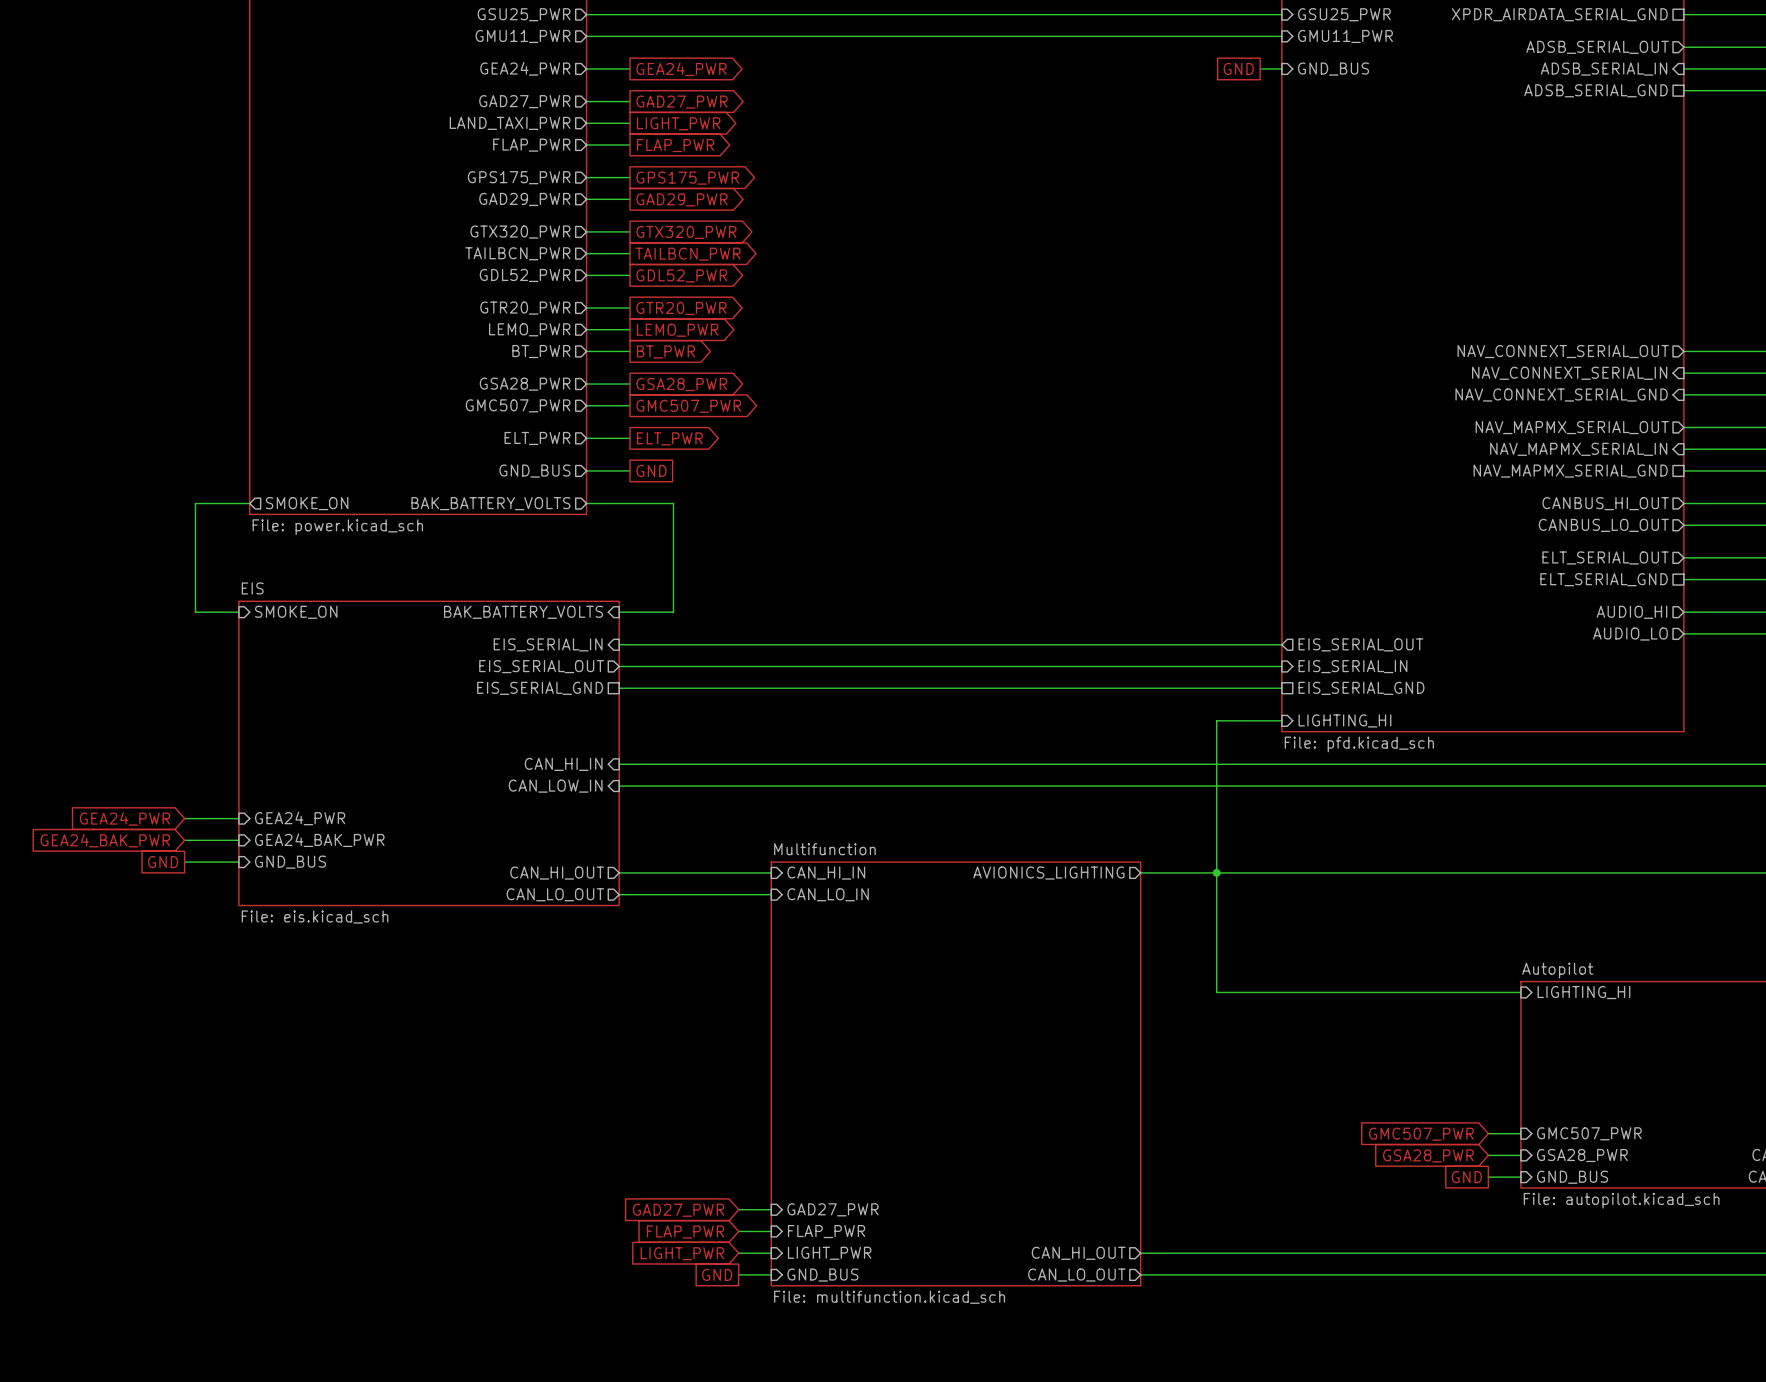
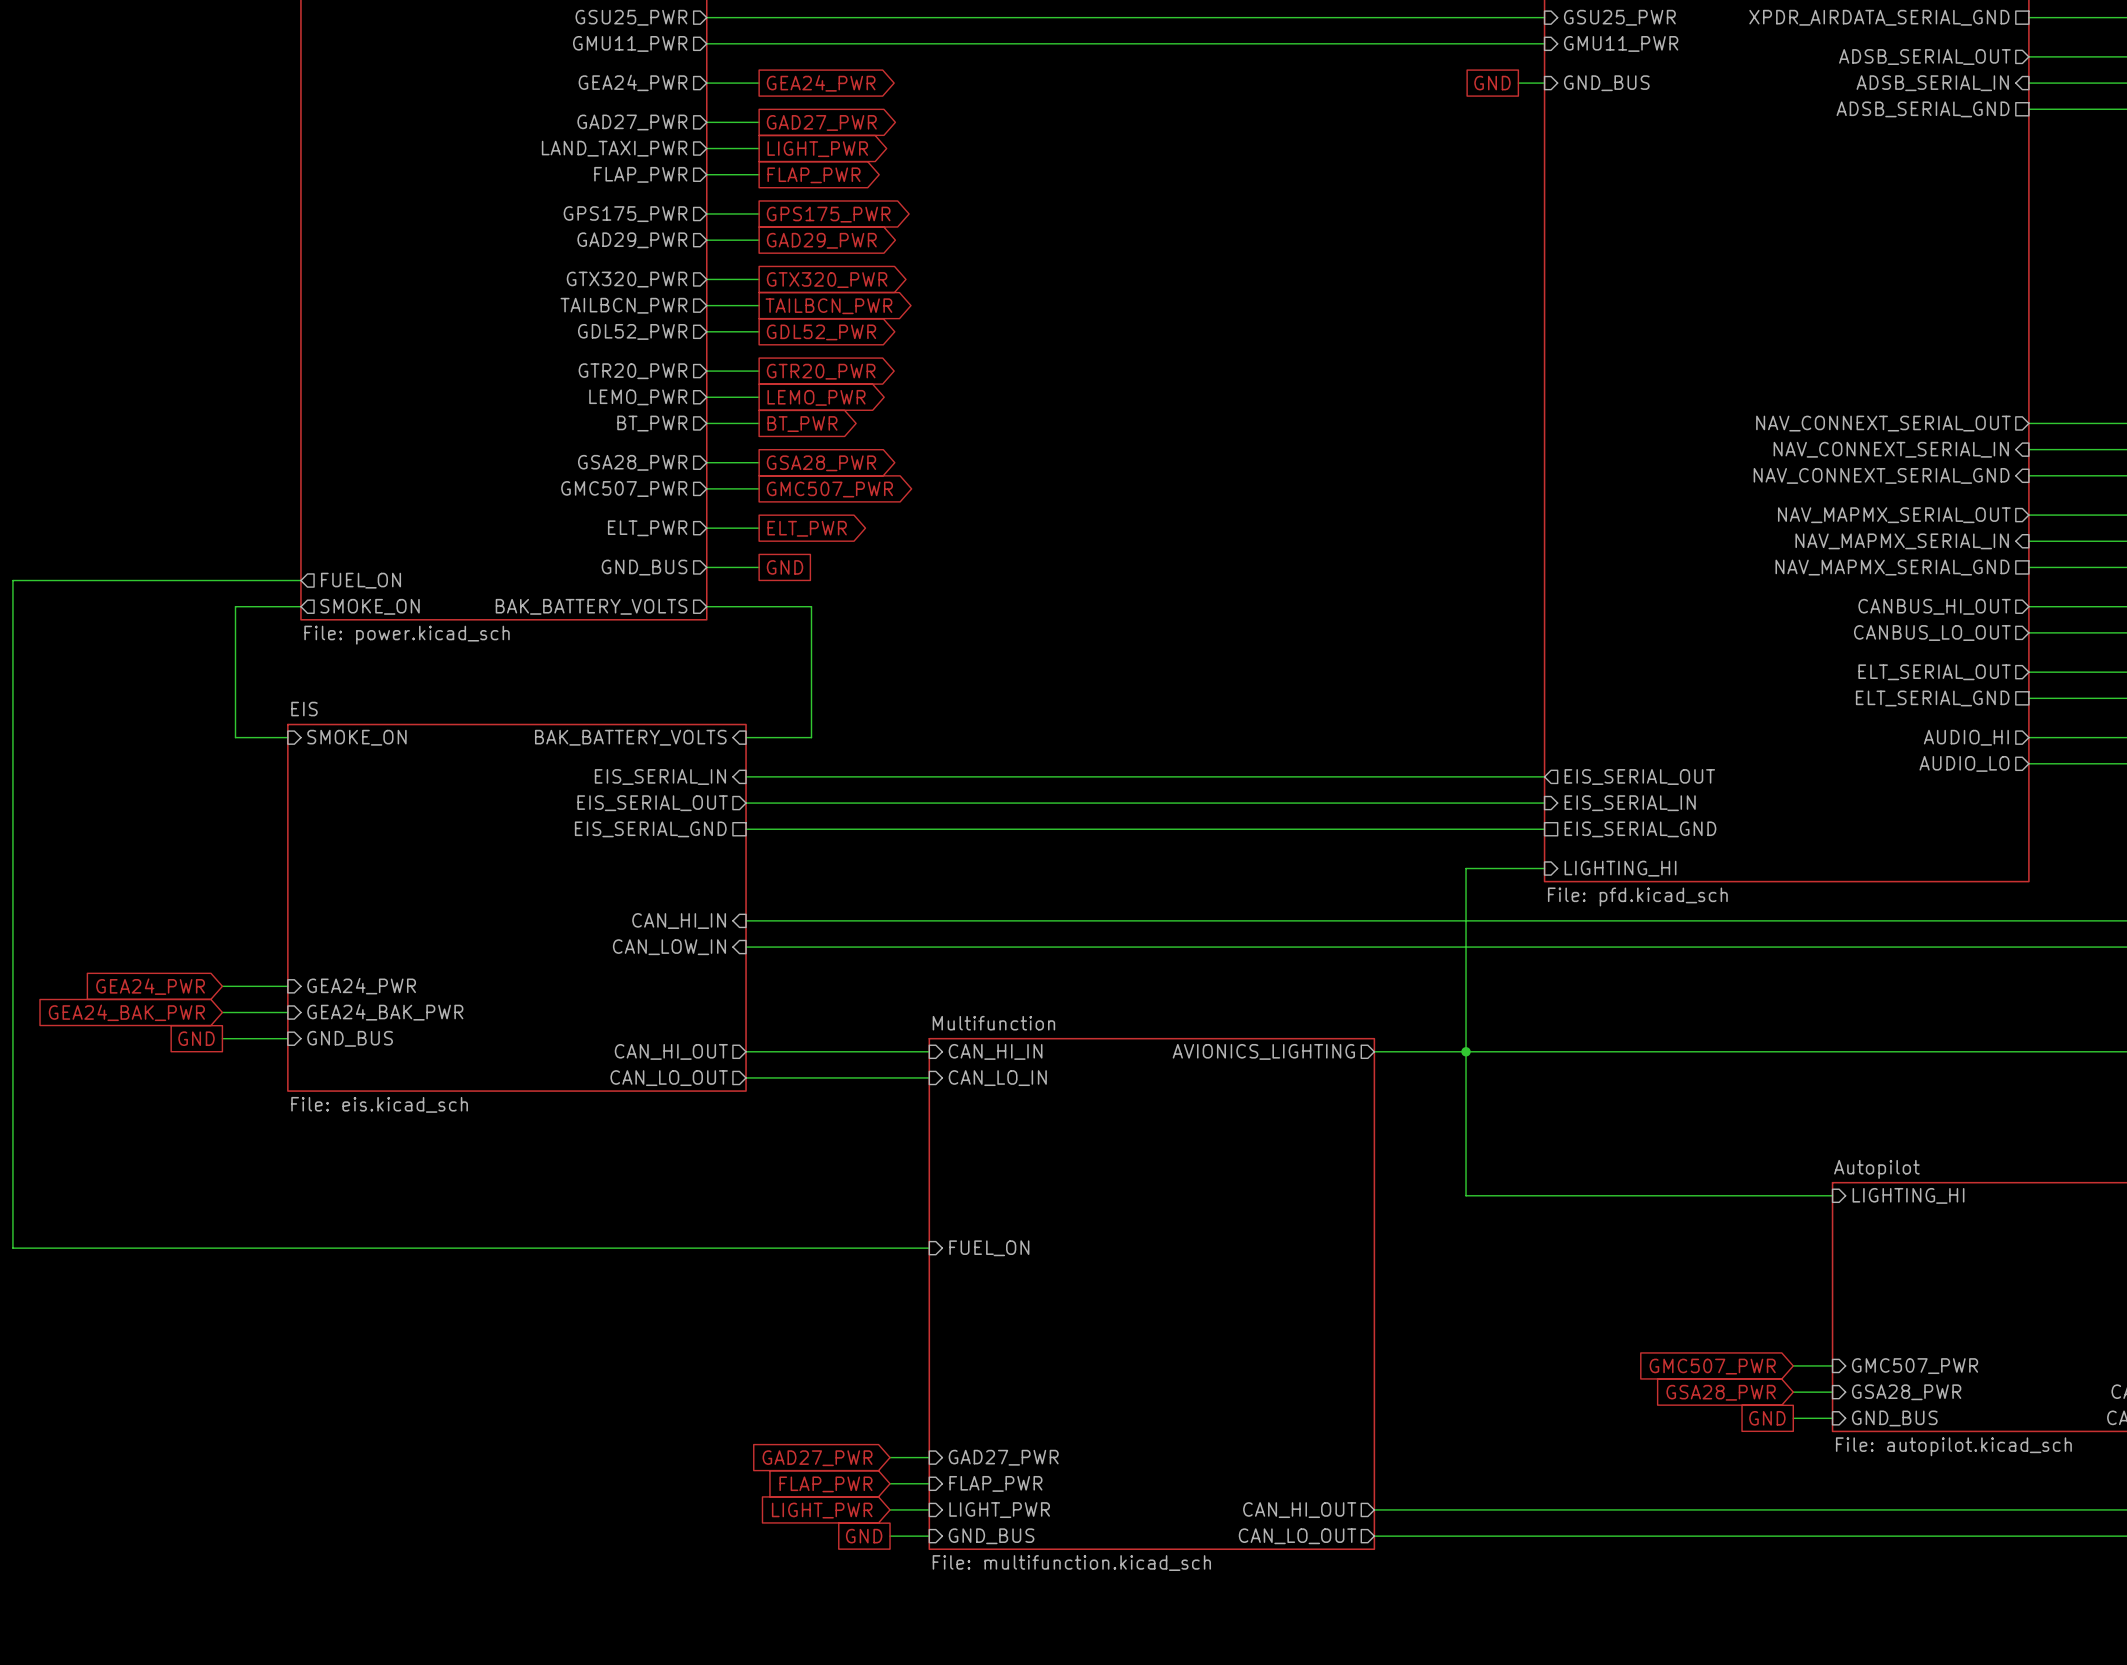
wire: none -> (300, 580) (12, 580) (12, 1248) (929, 1248)
sheet pin: none -> FUEL_ON (361, 580)
sheet pin: none -> FUEL_ON (989, 1248)

